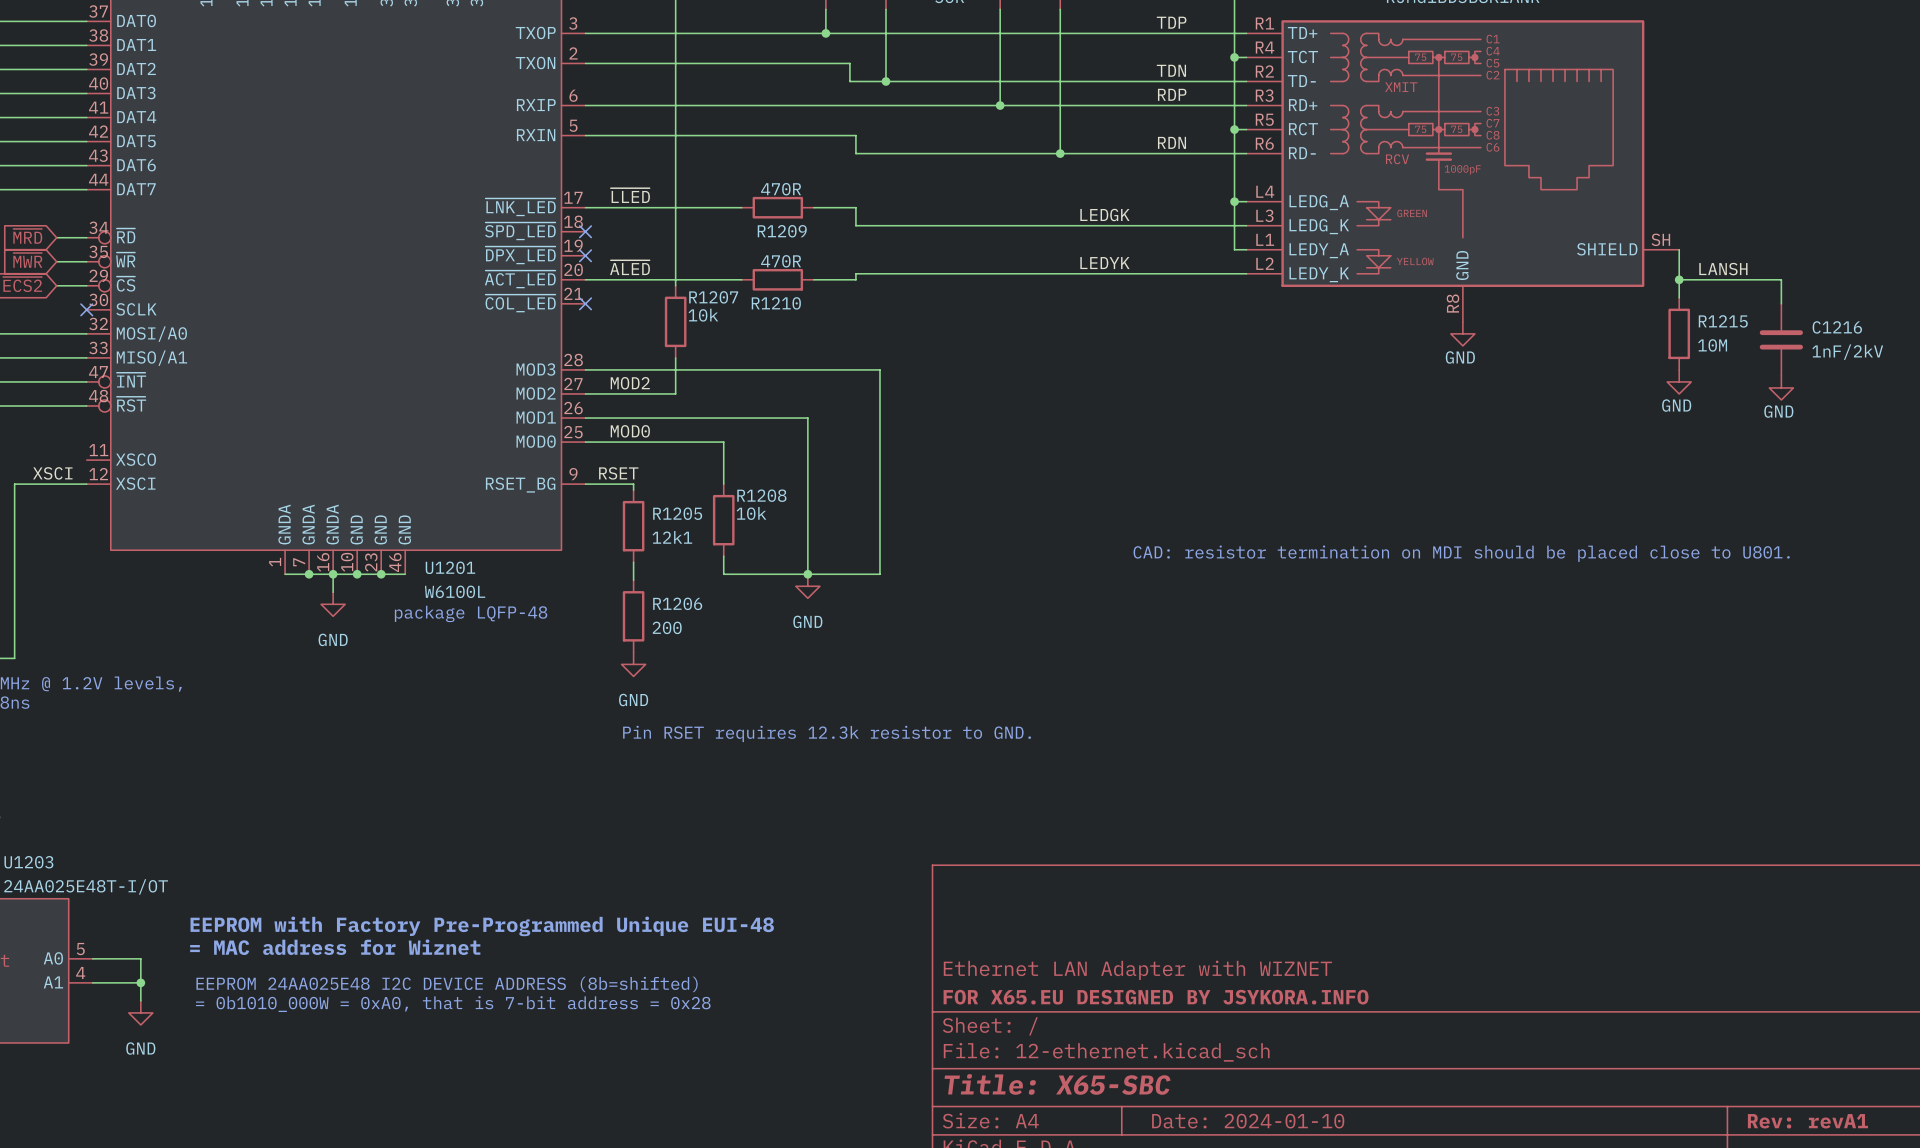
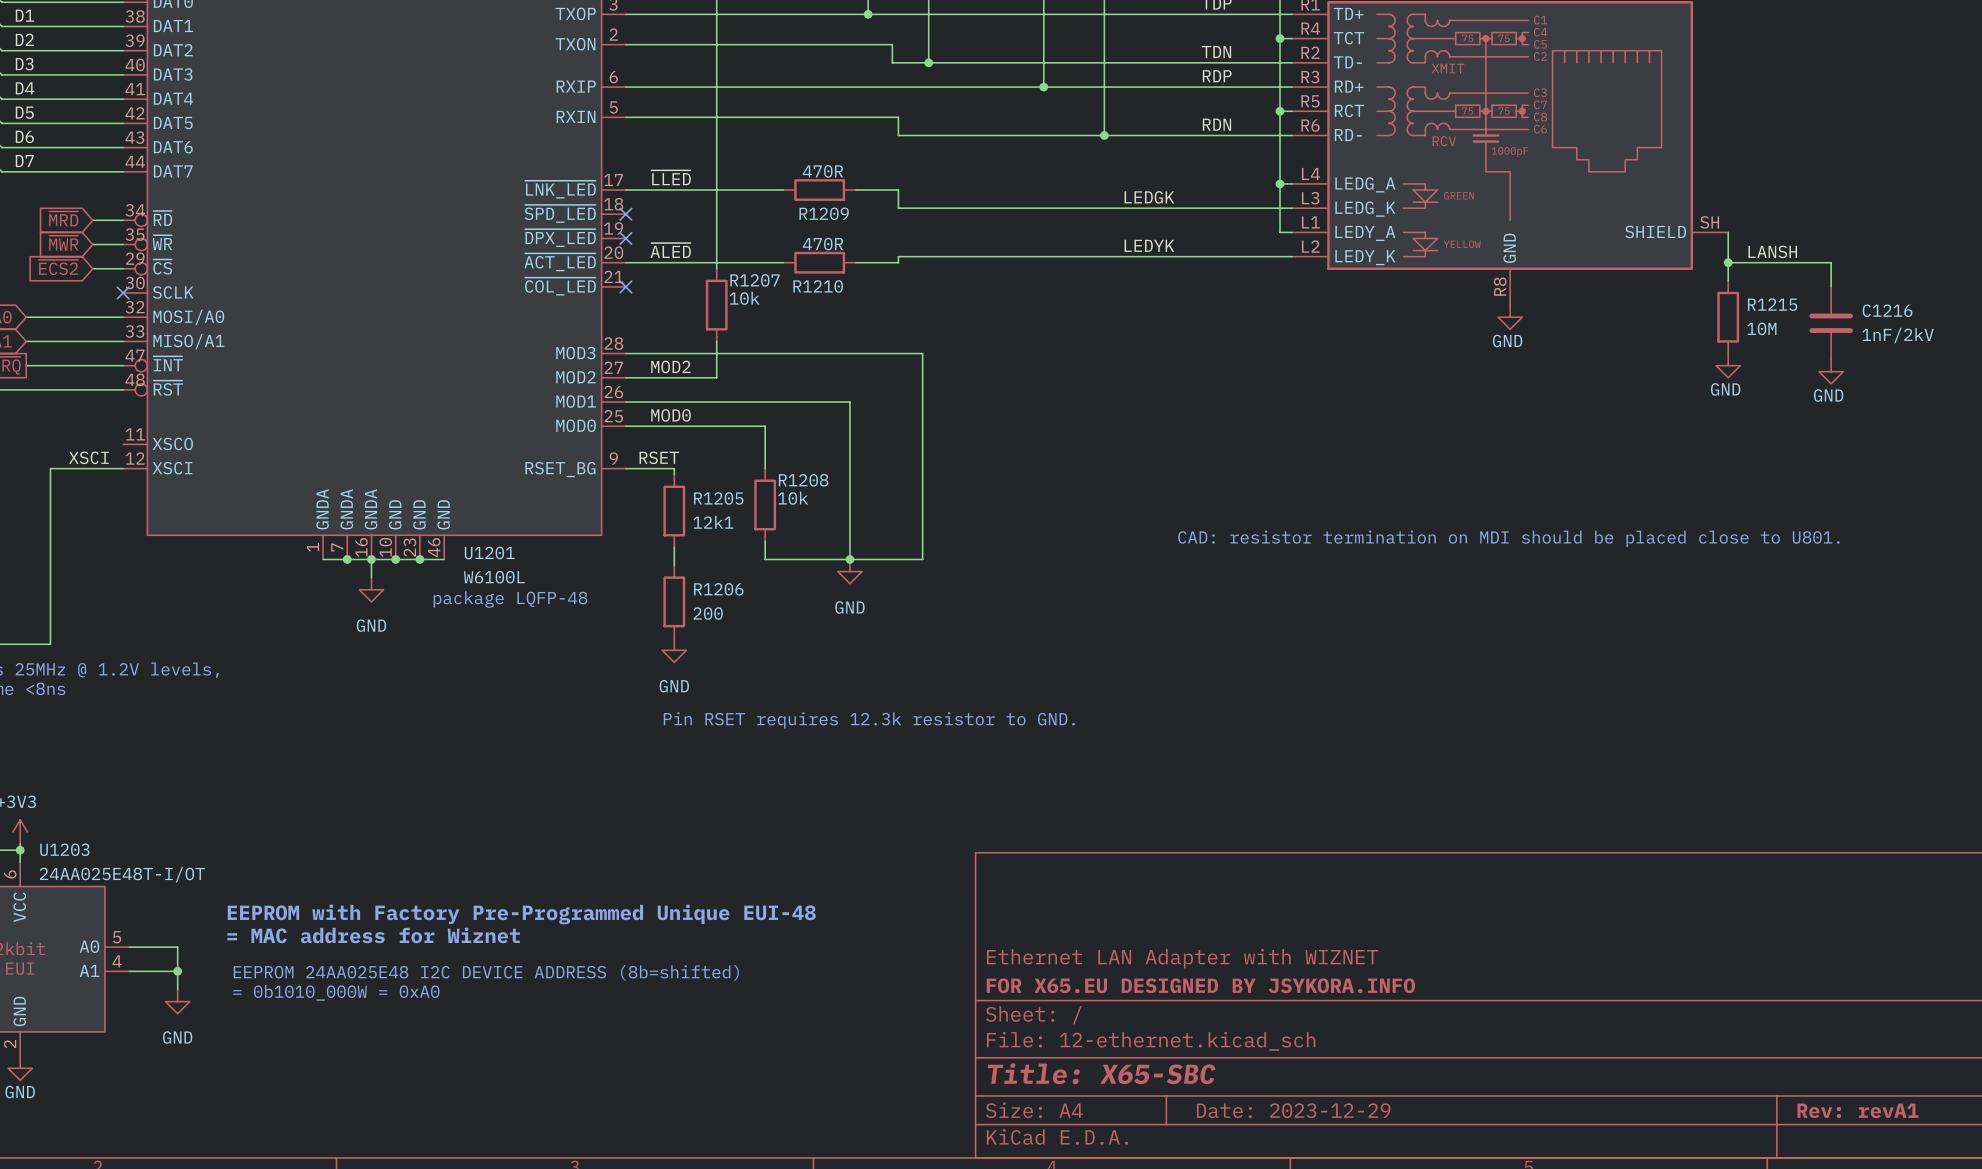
text: = 0b1010_000W = 0xA0, that is 7-bit address = 0x28 (453, 1004) -> = 0b1010_000W = 0xA0 (336, 992)
title block: Date: 2024-01-10 (1248, 1121) -> Date: 2023-12-29 (1293, 1110)

